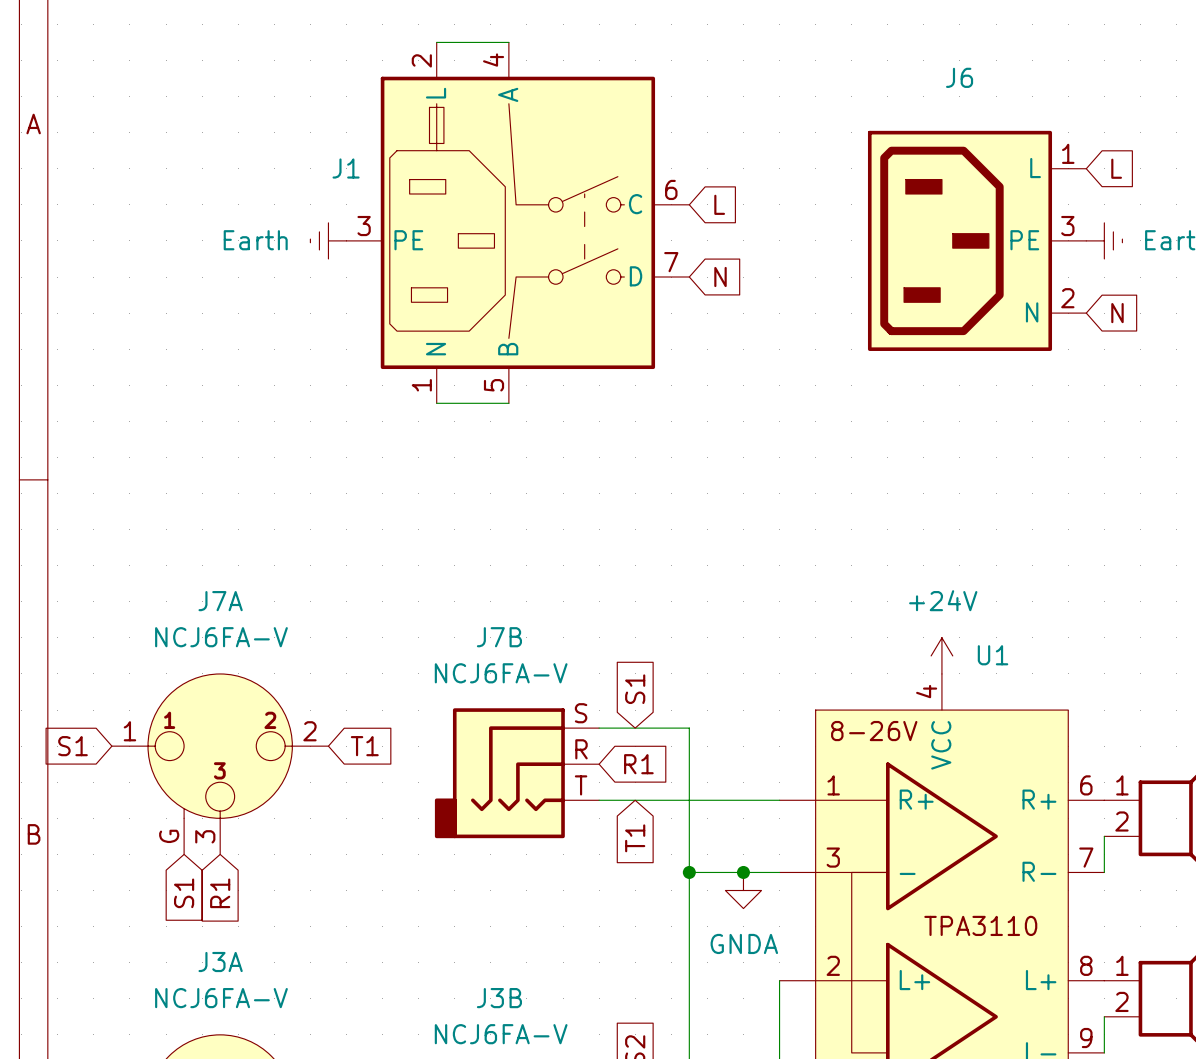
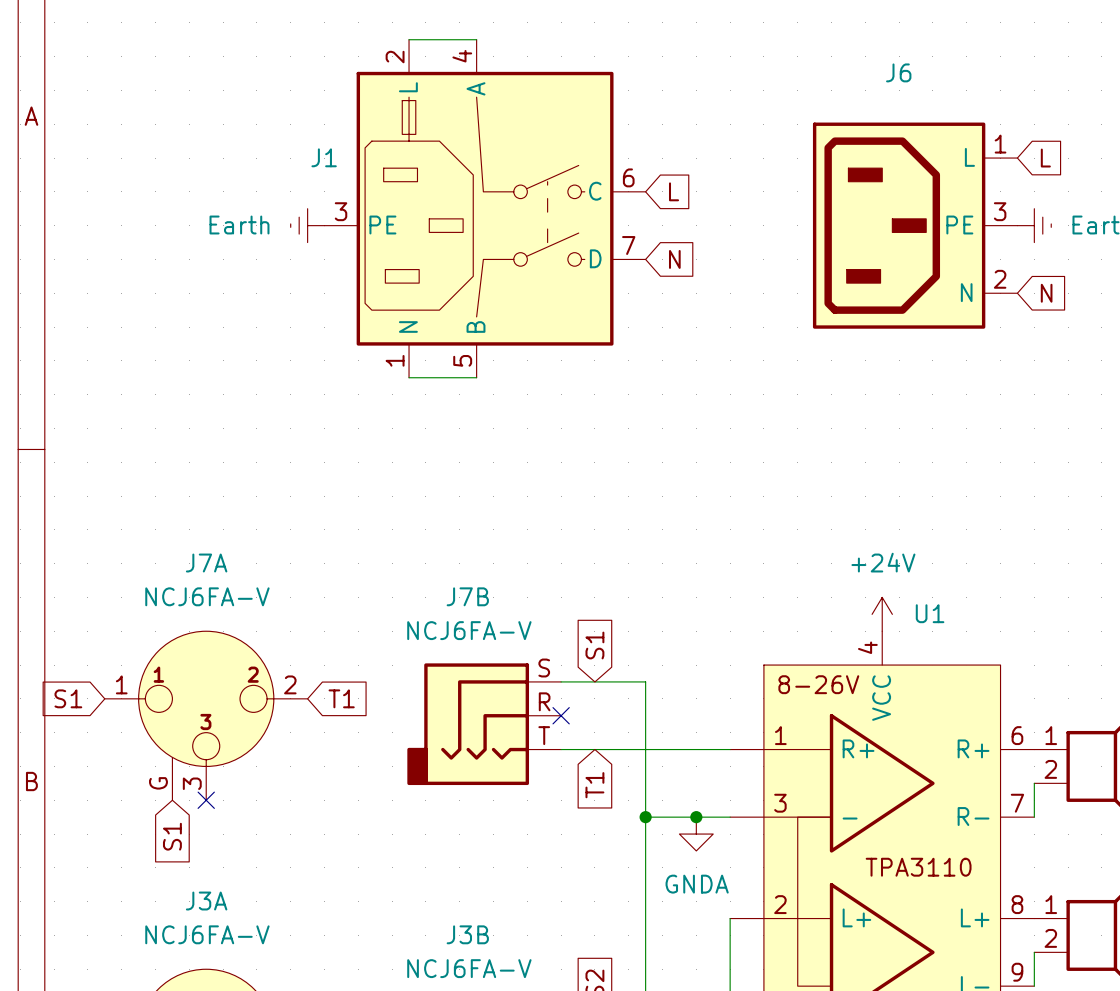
no-connect mark: none -> (561, 715)
global label: R1 (638, 764) -> none
no-connect mark: none -> (206, 800)
global label: R1 (220, 893) -> none

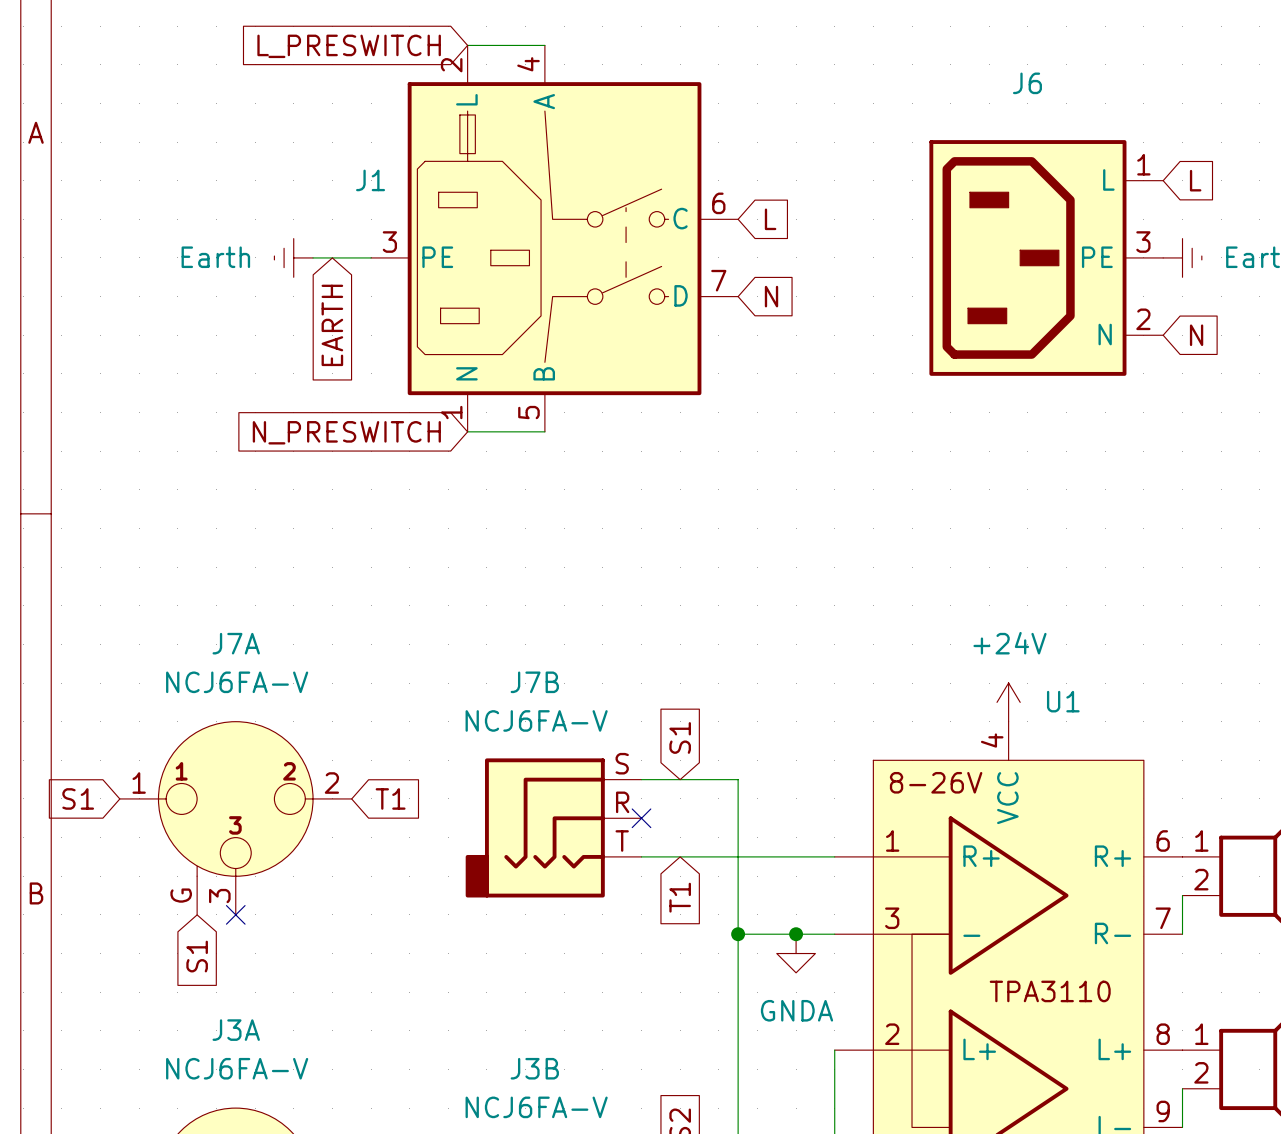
global label: none -> L_PRESWITCH (349, 46)
wire: none -> (313, 257) (371, 257)
power symbol position: Earth (307, 225) -> Earth (293, 257)
global label: none -> EARTH (332, 325)
global label: none -> N_PRESWITCH (346, 432)

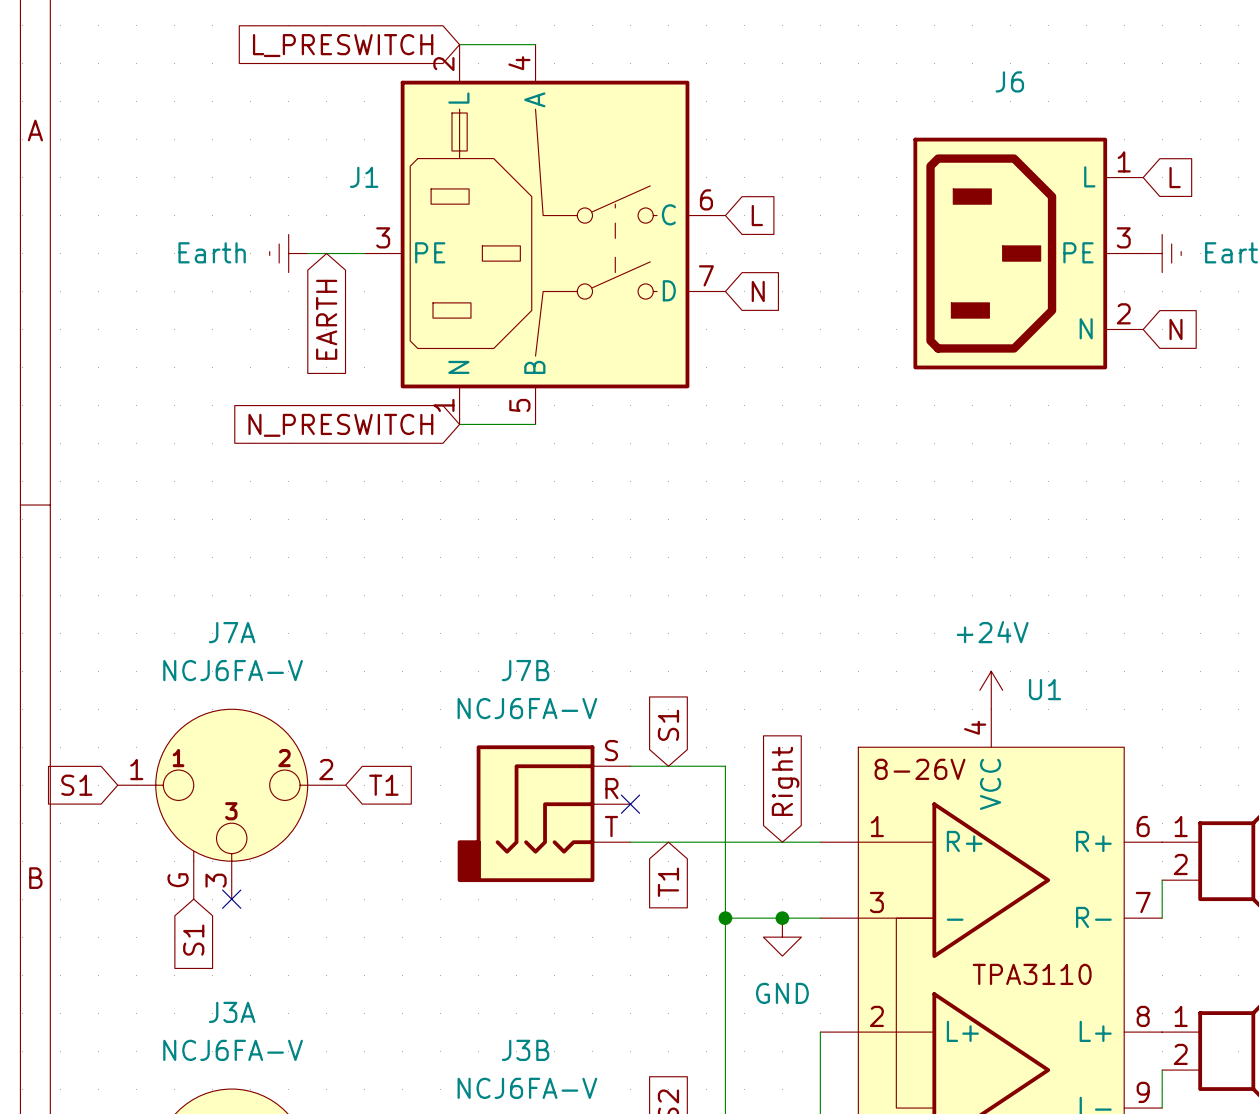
global label: none -> Right (785, 781)
power symbol: GNDA (796, 953) -> GND (782, 937)

